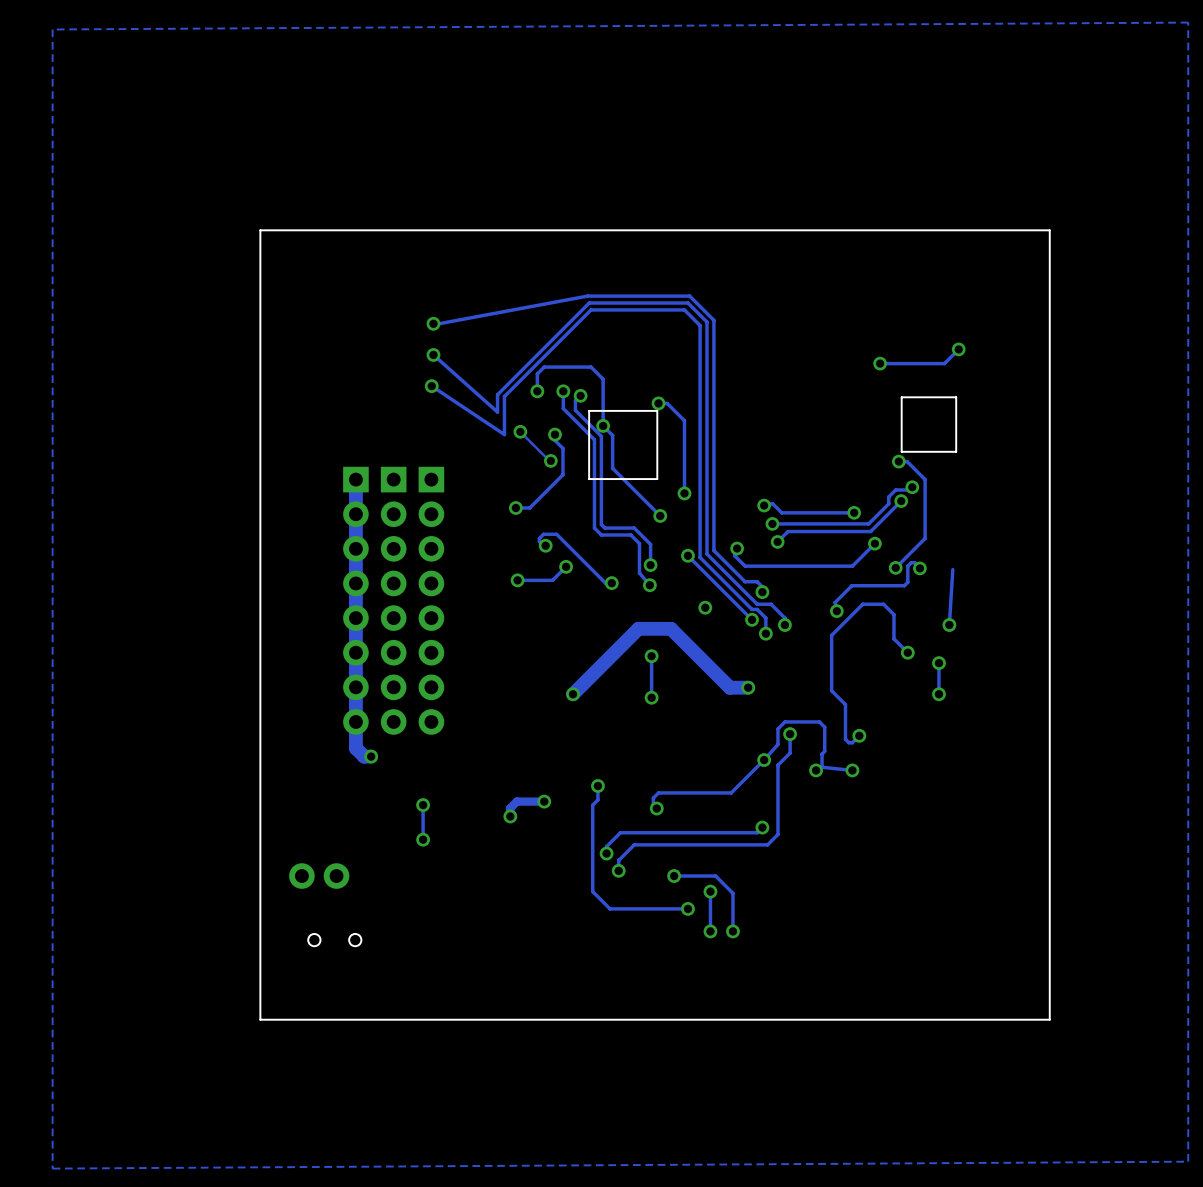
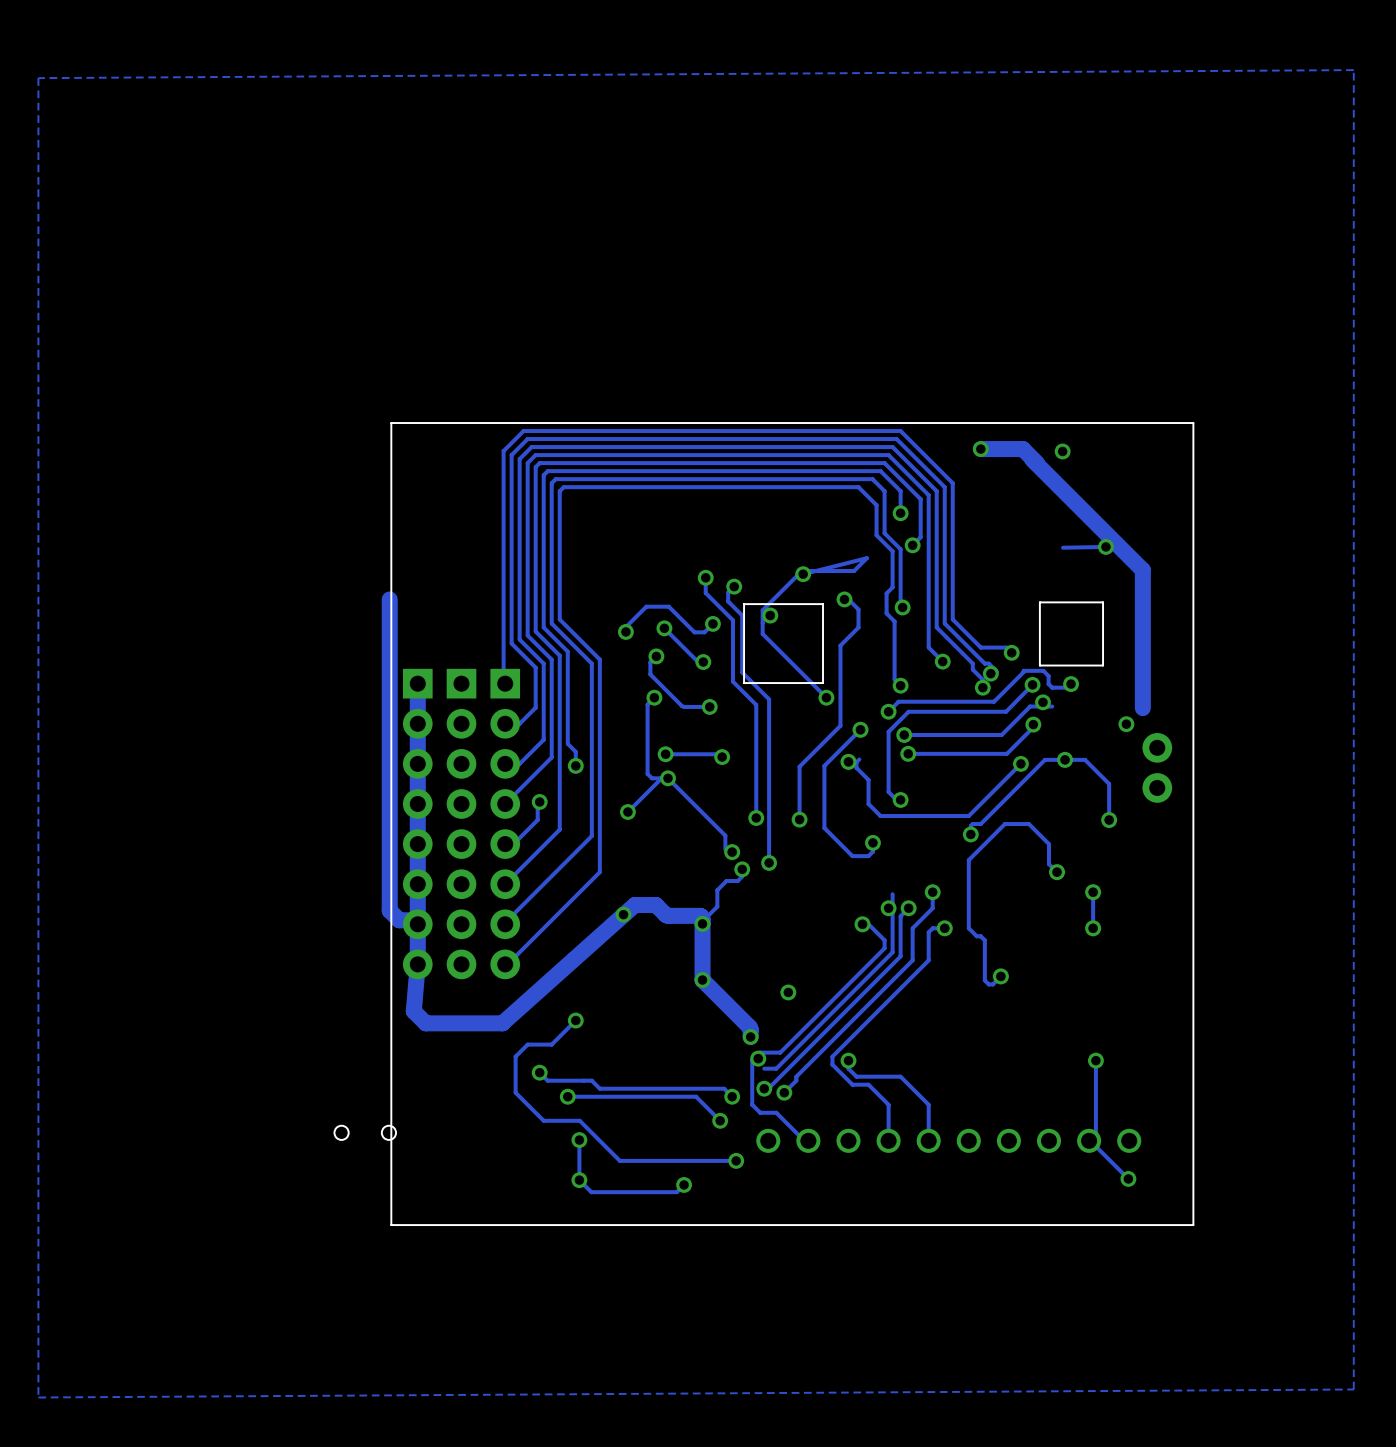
track: (433, 323) (587, 296) (689, 296) (713, 320) (713, 550) (745, 581) (757, 581) (762, 586) (762, 592) -> none
via: (433, 323) -> none
board edge: (1049, 327) (1049, 230) (260, 230) (260, 1019) (357, 1019) -> (1193, 423) (391, 423) (391, 1225)
track: none -> (980, 449) (1022, 449) (1036, 463)
track: (958, 349) (944, 363) (880, 363) -> none
via position: (958, 349) -> (1062, 451)
track: (433, 354) (497, 412) (497, 394) (589, 303) (687, 303) (707, 322) (707, 554) (757, 604) (771, 604) (784, 618) (784, 625) -> none
via: (433, 354) -> none
track: none -> (1032, 459) (1142, 570) (1142, 708)
via position: (880, 363) -> (980, 449)
track: (431, 386) (504, 434) (504, 396) (591, 309) (684, 309) (700, 325) (700, 557) (752, 609) (757, 609) (765, 618) (765, 633) -> none
via: (431, 386) -> none
track: (537, 391) (537, 374) (544, 367) (591, 367) (603, 379) (603, 425) (612, 435) (612, 468) (660, 515) -> none
via: (537, 391) -> none
track: (563, 391) (563, 408) (594, 439) (594, 528) (601, 535) (630, 535) (639, 543) (639, 573) (649, 585) -> none
via: (563, 391) -> none
track: (580, 395) (575, 401) (575, 410) (601, 436) (601, 524) (604, 528) (634, 528) (650, 544) (650, 565) -> none
via: (580, 395) -> none
track: (658, 403) (667, 403) (684, 420) (684, 493) -> none
via: (658, 403) -> none
track: none -> (900, 513) (900, 491) (880, 471) (547, 471) (543, 475) (543, 627) (567, 651) (567, 743) (575, 751) (575, 765)
via: none -> (900, 513)
part position: (928, 424) -> (1071, 633)
via: (603, 425) -> none
track: (520, 431) (550, 460) -> none
via: (520, 431) -> none
track: none -> (912, 545) (920, 537) (920, 499) (884, 463) (539, 463) (535, 467) (535, 631) (559, 655) (559, 829) (505, 884)
via: none -> (912, 545)
track: (555, 434) (555, 440) (562, 448) (562, 474) (529, 507) (515, 507) -> none
via: (555, 434) -> none
track: none -> (1105, 546) (1063, 547)
via: none -> (1105, 546)
part position: (623, 444) -> (783, 643)
track: none -> (803, 574) (866, 558) (854, 570) (803, 570) (801, 571) (762, 610) (762, 633) (826, 697)
via: none -> (803, 574)
via: (550, 460) -> none
track: none -> (705, 577) (705, 593) (733, 620) (733, 681) (756, 704) (756, 818)
via: none -> (705, 577)
track: (898, 461) (907, 461) (925, 479) (925, 538) (895, 567) -> none
via: (898, 461) -> none
track: none -> (734, 586) (728, 592) (728, 601) (742, 615) (742, 672) (769, 699) (769, 862)
via: none -> (734, 586)
track: none -> (844, 599) (848, 599) (858, 609) (858, 627) (840, 645) (840, 725) (799, 766) (799, 819)
via: none -> (844, 599)
track: none -> (902, 607) (900, 605) (900, 549) (884, 533) (884, 491) (872, 479) (555, 479) (551, 483) (551, 623) (591, 663) (591, 836) (505, 924)
via: none -> (902, 607)
track: (912, 487) (909, 489) (895, 489) (888, 496) (888, 503) (868, 523) (772, 523) -> none
via: (912, 487) -> none
track: none -> (712, 623) (704, 632) (694, 632) (668, 606) (646, 606) (625, 627) (625, 631)
via: none -> (712, 623)
track: (901, 501) (870, 531) (788, 531) (777, 541) -> none
via: (901, 501) -> none
track: none -> (664, 628) (698, 662) (703, 662)
via: none -> (664, 628)
track: (764, 505) (772, 503) (781, 512) (854, 512) -> none
via: (764, 505) -> none
via: (515, 507) -> none
via: none -> (625, 631)
via: (854, 512) -> none
via: (660, 515) -> none
via: (772, 523) -> none
track: none -> (1011, 652) (1006, 647) (980, 647) (952, 619) (952, 483) (900, 431) (523, 431) (503, 451) (503, 682) (505, 683)
via: none -> (1011, 652)
track: none -> (656, 656) (650, 662) (650, 674) (681, 705) (709, 706)
via: none -> (656, 656)
via: none -> (703, 662)
track: none -> (942, 661) (928, 647) (928, 495) (888, 455) (535, 455) (527, 463) (527, 635) (551, 659) (551, 757) (505, 803)
via: none -> (942, 661)
via: (777, 541) -> none
track: none -> (996, 671) (988, 663) (984, 663) (944, 623) (944, 487) (896, 439) (527, 439) (511, 455) (511, 643) (535, 667) (535, 707) (519, 723) (505, 723)
track: (874, 543) (852, 566) (745, 566) (734, 555) (734, 550) (737, 548) -> none
track: (545, 545) (539, 541) (539, 538) (543, 534) (556, 534) (605, 583) (611, 583) -> none
via: (545, 545) -> none
via position: (737, 548) -> (826, 697)
track: none -> (417, 683) (417, 964) (413, 1011) (425, 1023) (502, 1023) (634, 905) (656, 905) (667, 915) (701, 917) (702, 980) (749, 1027) (750, 1036)
track: none -> (1071, 684) (1067, 688) (1052, 687) (1048, 684) (1048, 676) (1043, 670) (1023, 670) (994, 701) (898, 701) (888, 711)
via: none -> (1071, 684)
track: none -> (1032, 684) (1006, 711) (908, 711) (888, 731) (888, 791) (896, 799) (900, 799)
via: none -> (1032, 684)
track: none -> (900, 685) (894, 679) (894, 621) (886, 613) (886, 593) (892, 587) (892, 551) (876, 535) (876, 505) (858, 487) (563, 487) (559, 491) (559, 619) (599, 659) (599, 872) (507, 964) (505, 964)
via: none -> (900, 685)
track: (687, 555) (752, 619) -> none
via: (687, 555) -> none
track: none -> (982, 687) (982, 679) (972, 669) (972, 663) (936, 627) (936, 491) (892, 447) (531, 447) (519, 459) (519, 639) (543, 663) (543, 739) (519, 763) (505, 763)
via: none -> (982, 687)
track: none -> (654, 697) (647, 704) (647, 773) (651, 778) (668, 778) (725, 835) (725, 849)
via: none -> (654, 697)
via: (650, 565) -> none
track: (566, 566) (552, 580) (517, 580) -> none
via: (566, 566) -> none
via: (895, 567) -> none
track: (919, 568) (914, 562) (911, 562) (907, 566) (907, 582) (904, 585) (851, 585) (835, 602) (836, 611) -> none
track: (952, 569) (949, 625) -> none
via: none -> (709, 706)
track: none -> (1052, 706) (1030, 706) (1001, 735) (904, 735)
via: none -> (888, 711)
via: (517, 580) -> none
via: (611, 583) -> none
via: (649, 585) -> none
track: none -> (1033, 724) (1033, 727) (1006, 753) (908, 753)
via: none -> (1033, 724)
via: none -> (1126, 724)
track: none -> (855, 734) (824, 765) (824, 828) (852, 856) (868, 856) (872, 851) (872, 842)
via: none -> (904, 735)
part: (355, 600) -> none
part: (393, 600) -> none
part: (431, 600) -> none
via: (705, 607) -> none
via: (836, 611) -> none
via: none -> (908, 753)
track: none -> (665, 754) (719, 754) (722, 757)
via: none -> (665, 754)
via: none -> (722, 757)
track: none -> (859, 759) (856, 762) (856, 767) (868, 779) (868, 803) (880, 816) (968, 816) (1020, 763)
via: none -> (1020, 763)
via: none -> (575, 765)
via: (784, 625) -> none
via position: (949, 625) -> (1065, 759)
part: none -> (1157, 767)
via: (765, 633) -> none
track: none -> (661, 778) (627, 812)
via: none -> (668, 778)
via: none -> (900, 799)
track: (907, 652) (893, 638) (893, 614) (883, 604) (862, 604) (831, 635) (831, 690) (845, 704) (845, 739) (848, 742) (852, 742) (859, 735) -> none
via: (907, 652) -> none
track: none -> (539, 801) (537, 803) (537, 820) (513, 844) (505, 844)
via: none -> (539, 801)
track: (651, 656) (651, 697) -> none
via: (651, 656) -> none
via: none -> (627, 812)
track: (938, 663) (938, 694) -> (1093, 892) (1093, 928)
via: (938, 663) -> none
via: none -> (756, 818)
via: none -> (799, 819)
track: none -> (1109, 820) (1109, 783) (1085, 759) (1045, 759) (980, 824) (972, 824) (970, 826) (970, 834)
via: none -> (1109, 820)
part: none -> (417, 824)
part: none -> (461, 824)
part: none -> (505, 824)
via: none -> (970, 834)
track: (748, 687) (729, 687) (670, 628) (638, 628) (573, 694) -> none
via: (748, 687) -> none
via: none -> (872, 842)
via: (573, 694) -> none
via position: (938, 694) -> (1057, 872)
via: none -> (769, 862)
track: none -> (742, 869) (742, 876) (737, 880) (726, 880) (717, 890) (717, 906) (701, 922) (702, 923)
via: none -> (742, 869)
track: none -> (1057, 872) (1049, 864) (1049, 844) (1028, 824) (1004, 824) (968, 860) (968, 928) (976, 936) (980, 936) (984, 940) (984, 980) (988, 984) (992, 984) (1000, 976)
track: (824, 732) (824, 727) (819, 721) (784, 721) (777, 728) (777, 744) (731, 792) (658, 792) (653, 798) (653, 805) (656, 808) -> none
via: none -> (932, 892)
via: none -> (1093, 892)
via position: (790, 734) -> (888, 908)
via: (859, 735) -> none
track: none -> (908, 908) (900, 916) (900, 956) (768, 1088) (764, 1088)
via: none -> (908, 908)
track: (824, 746) (824, 751) (822, 754) (822, 767) -> (932, 908) (912, 928) (912, 960) (796, 1076) (796, 1080) (784, 1092)
via: none -> (623, 914)
track: (790, 753) (777, 765) (777, 834) -> (944, 928) (932, 928) (928, 932) (928, 960) (878, 1010)
track: none -> (892, 916) (892, 952) (776, 1068) (764, 1068)
via: (371, 756) -> none
via: none -> (702, 923)
track: none -> (868, 924) (884, 940) (884, 948) (780, 1052) (760, 1052) (752, 1060) (752, 1104) (760, 1112) (776, 1112) (804, 1140) (808, 1140)
via: none -> (944, 928)
via: none -> (1093, 928)
via: (816, 770) -> none
track: (852, 770) (819, 766) (816, 770) -> none
via: (852, 770) -> none
track: (597, 786) (597, 799) (592, 805) (592, 891) (610, 908) -> (567, 1096) (684, 1096)
via: (597, 786) -> none
track: (544, 801) (516, 801) (510, 808) (510, 816) -> none
via: (544, 801) -> none
track: (423, 805) (423, 839) -> none
via: (423, 805) -> none
via: none -> (1000, 976)
via: none -> (702, 980)
via: (656, 808) -> none
via: (510, 816) -> none
via: none -> (788, 992)
track: (762, 827) (757, 832) (620, 832) (606, 846) (606, 853) -> none
via: (762, 827) -> none
via: (423, 839) -> none
track: none -> (575, 1020) (551, 1044) (527, 1044) (515, 1056) (515, 1092) (543, 1120) (579, 1120) (619, 1160) (736, 1160)
via: none -> (575, 1020)
track: (767, 844) (634, 844) (618, 860) (618, 870) -> (866, 1022) (832, 1056) (832, 1064) (852, 1084) (868, 1084) (888, 1104) (888, 1140)
via: (606, 853) -> none
via: none -> (750, 1036)
via: (618, 870) -> none
part: (319, 876) -> none
track: (674, 876) (715, 876) (732, 893) (732, 931) -> none
track: none -> (848, 1060) (848, 1068) (856, 1076) (900, 1076) (928, 1104) (928, 1140)
via: none -> (848, 1060)
track: none -> (1095, 1060) (1095, 1146) (1128, 1178)
via: none -> (1095, 1060)
track: none -> (539, 1072) (547, 1080) (591, 1080) (599, 1088) (724, 1088) (732, 1096)
via: none -> (539, 1072)
track: (710, 891) (710, 931) -> none
via: (710, 891) -> none
via: none -> (764, 1088)
via: none -> (784, 1092)
via: none -> (567, 1096)
via: none -> (732, 1096)
track: (687, 908) (620, 908) -> (720, 1120) (696, 1096)
via: (687, 908) -> none
via: none -> (720, 1120)
via: (710, 931) -> none
via: (732, 931) -> none
track: none -> (579, 1140) (579, 1180) (591, 1192) (676, 1192) (684, 1184)
via: none -> (579, 1140)
part: none -> (948, 1140)
via: none -> (736, 1160)
via: none -> (1128, 1178)
via: none -> (579, 1180)
via: none -> (684, 1184)

